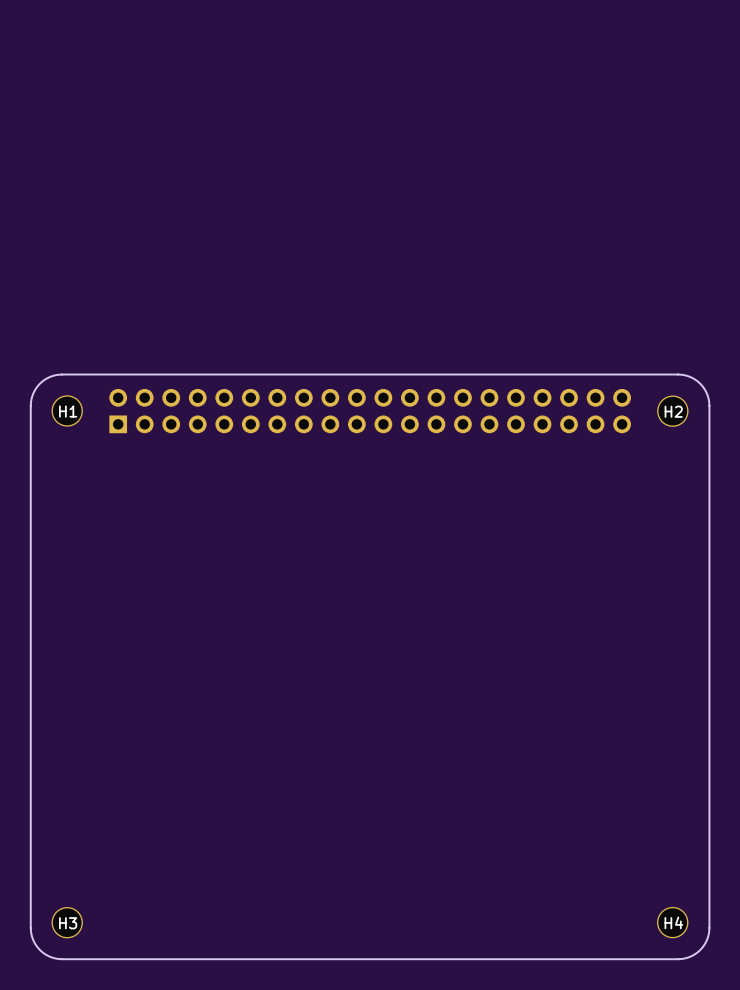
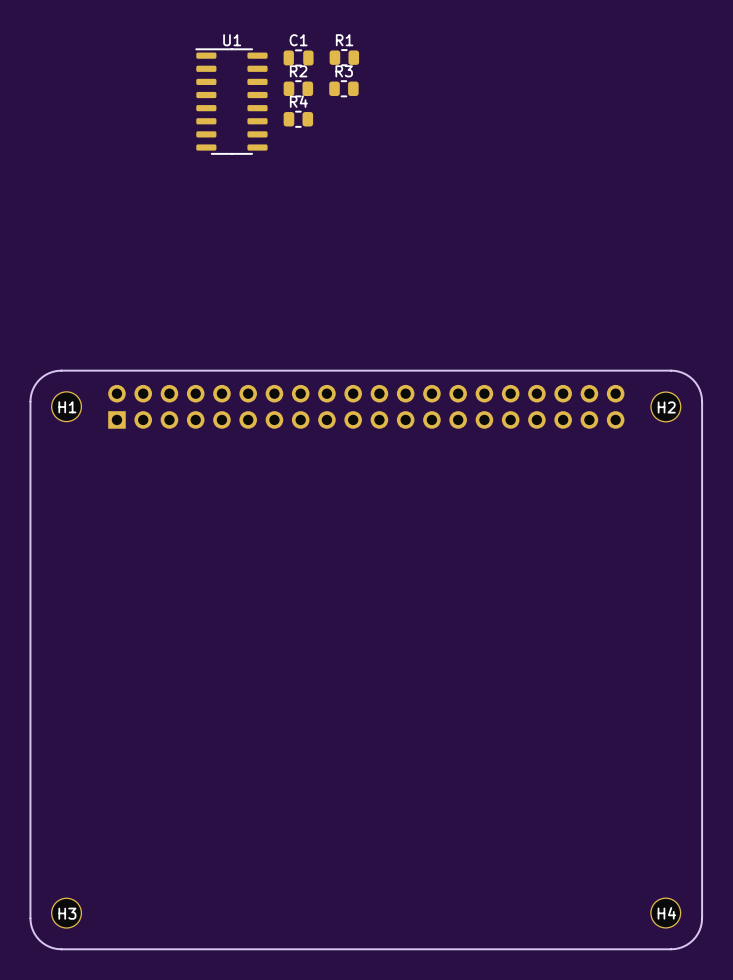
C1: none -> (298, 57)
R1: none -> (344, 57)
R2: none -> (298, 88)
R3: none -> (343, 88)
U1: none -> (231, 101)
R4: none -> (298, 119)

